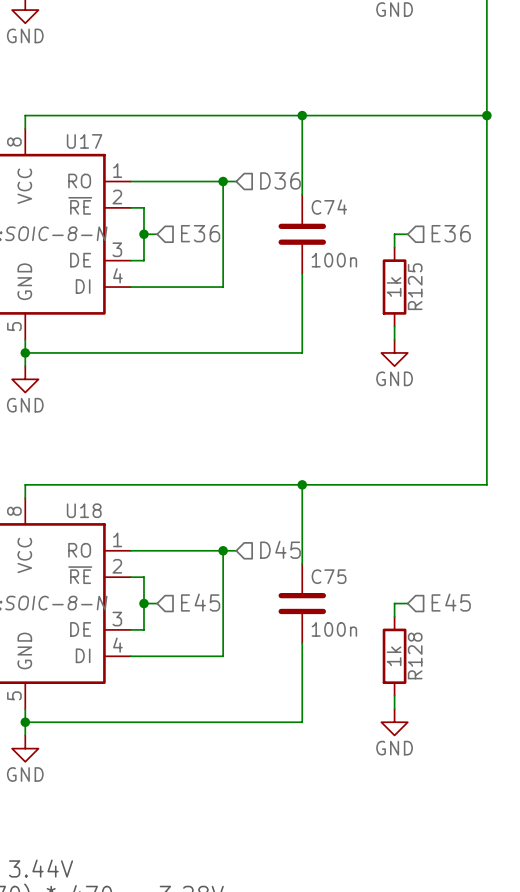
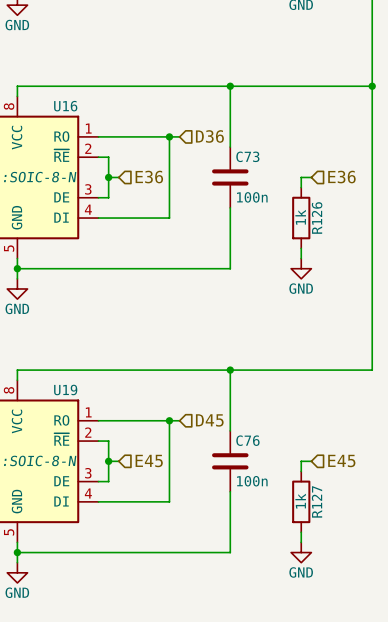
U17 name: U17 (84, 141) -> U16 (65, 106)
C74 name: C74 (329, 207) -> C73 (247, 156)
R125 name: R125 (415, 286) -> R126 (317, 217)
U18 name: U18 (84, 510) -> U19 (65, 389)
C75 name: C75 (329, 576) -> C76 (247, 440)
R128 name: R128 (415, 655) -> R127 (317, 501)

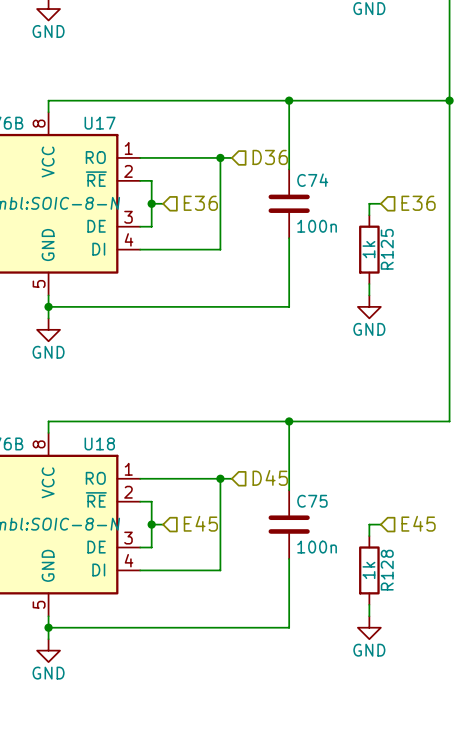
U16 name: U16 (65, 106) -> U17 (100, 123)
C73 name: C73 (247, 156) -> C74 (312, 180)
R126 name: R126 (317, 217) -> R125 (387, 249)
U19 name: U19 (65, 389) -> U18 (99, 443)
C76 name: C76 (247, 440) -> C75 (312, 501)
R127 name: R127 (317, 501) -> R128 (387, 570)

